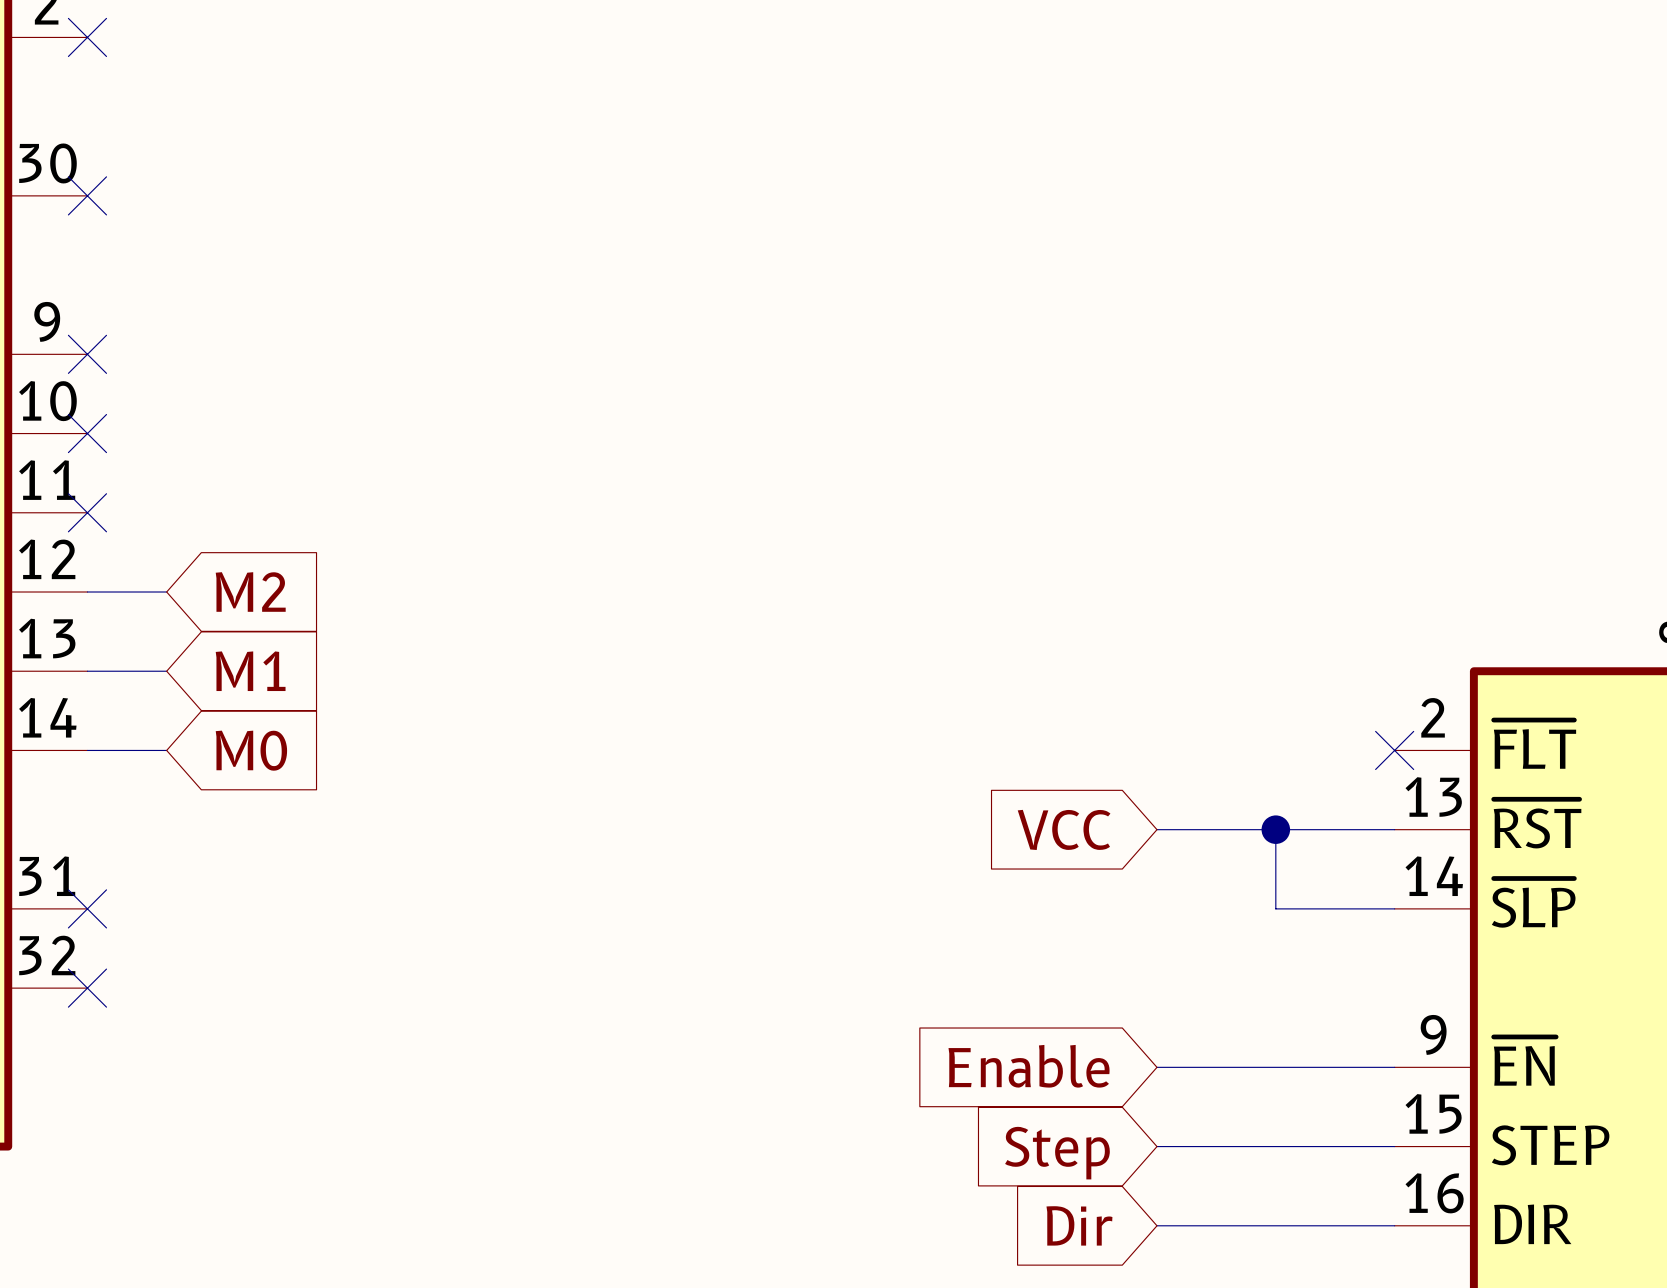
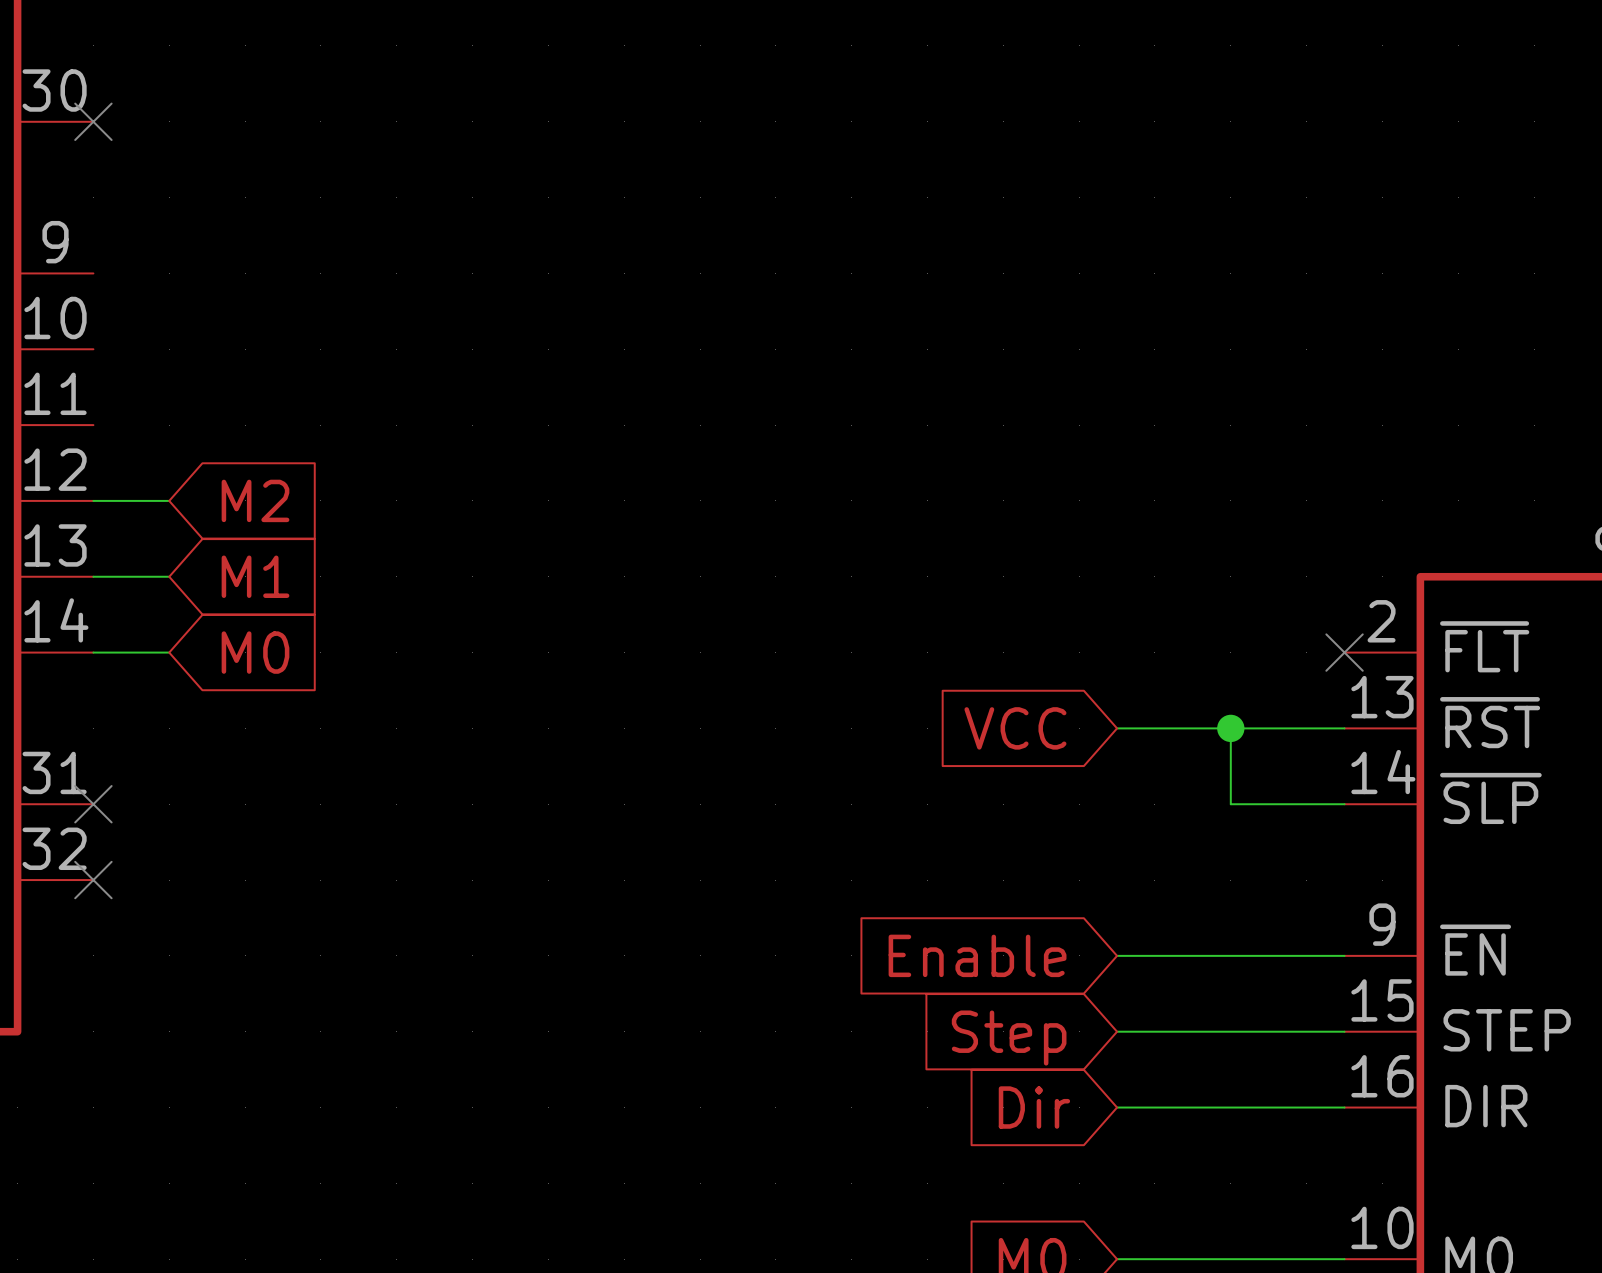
no-connect mark: (87, 354) -> none
no-connect mark: (87, 433) -> none
no-connect mark: (87, 512) -> none

